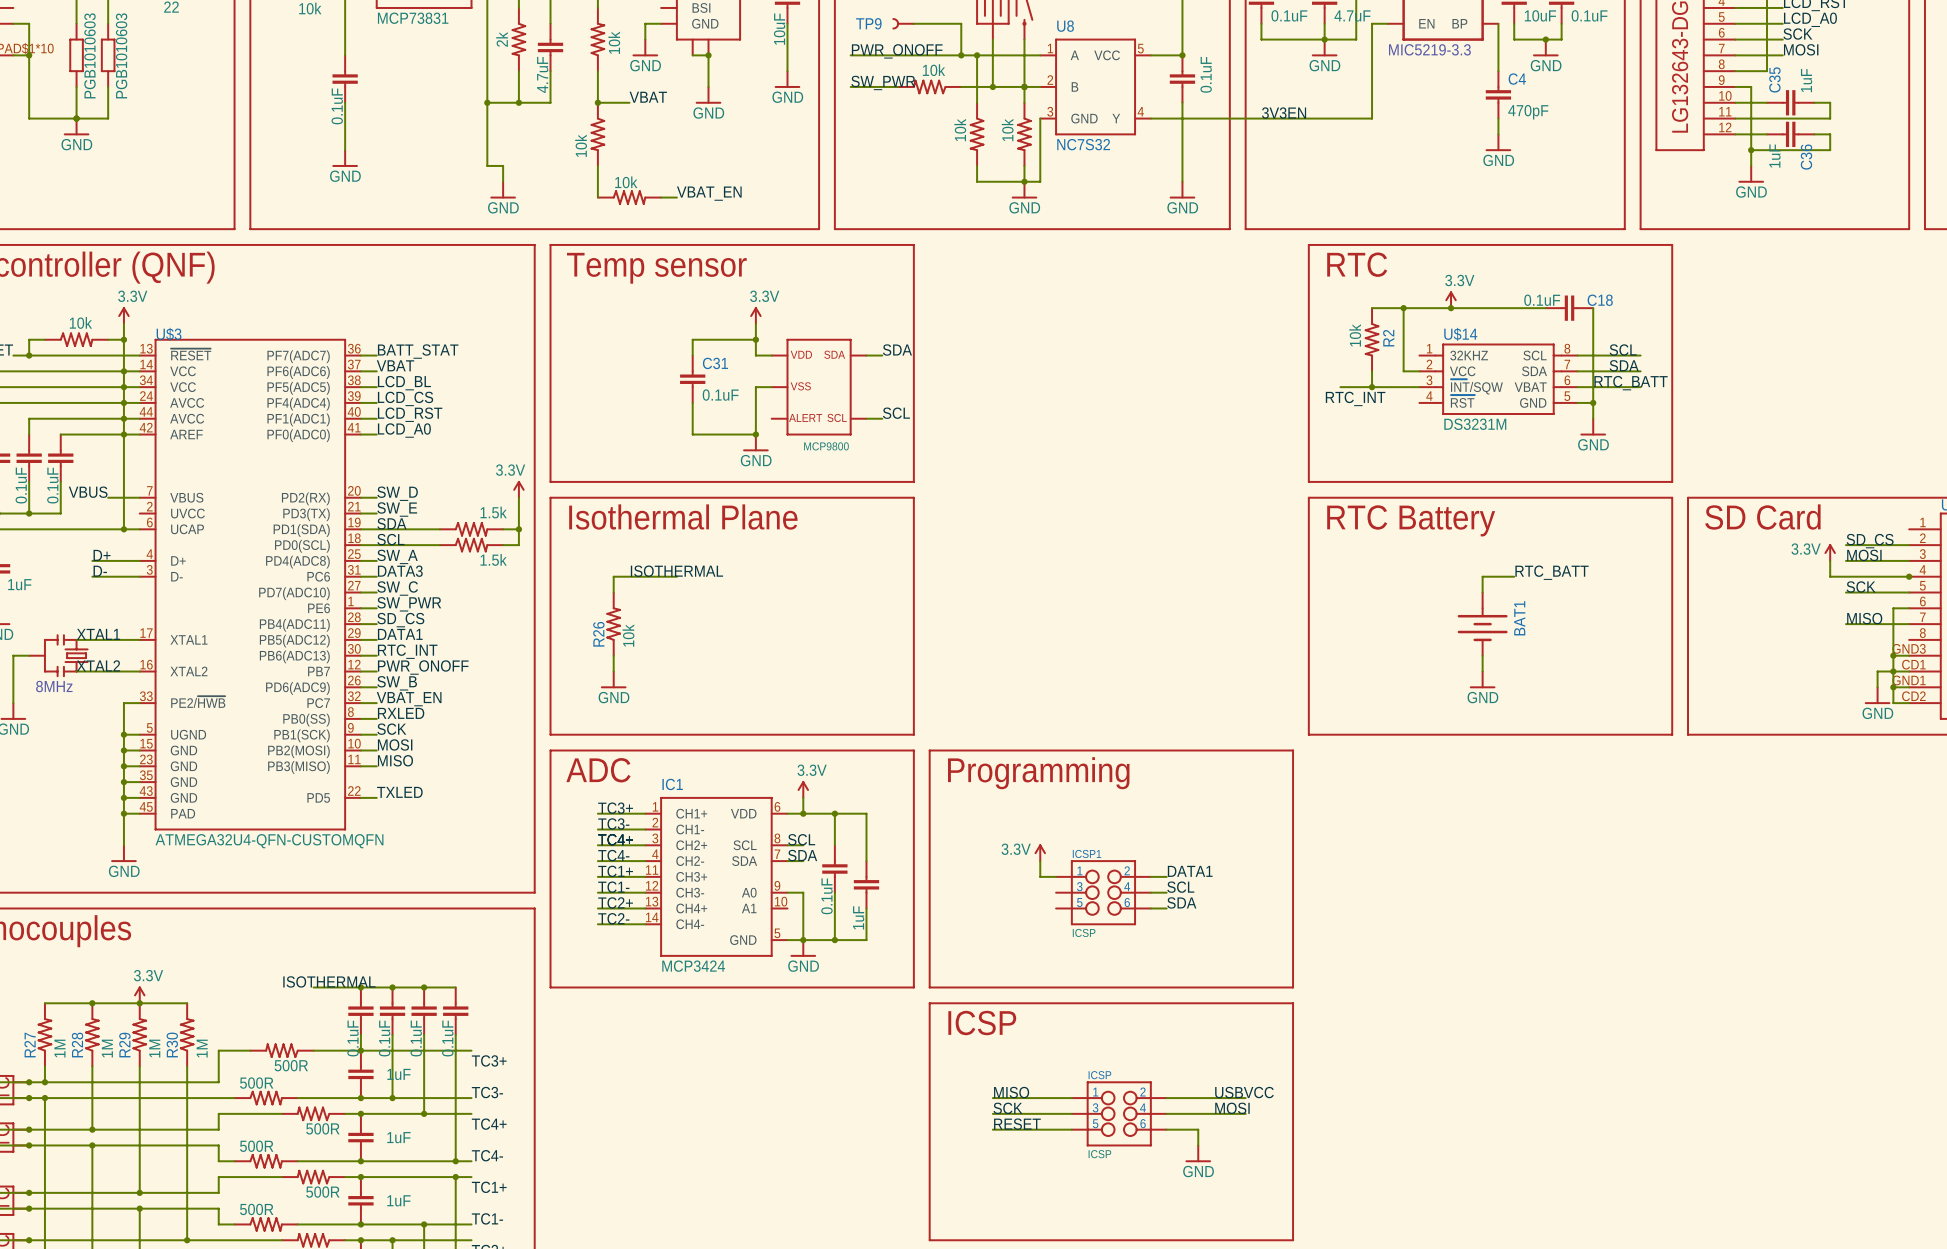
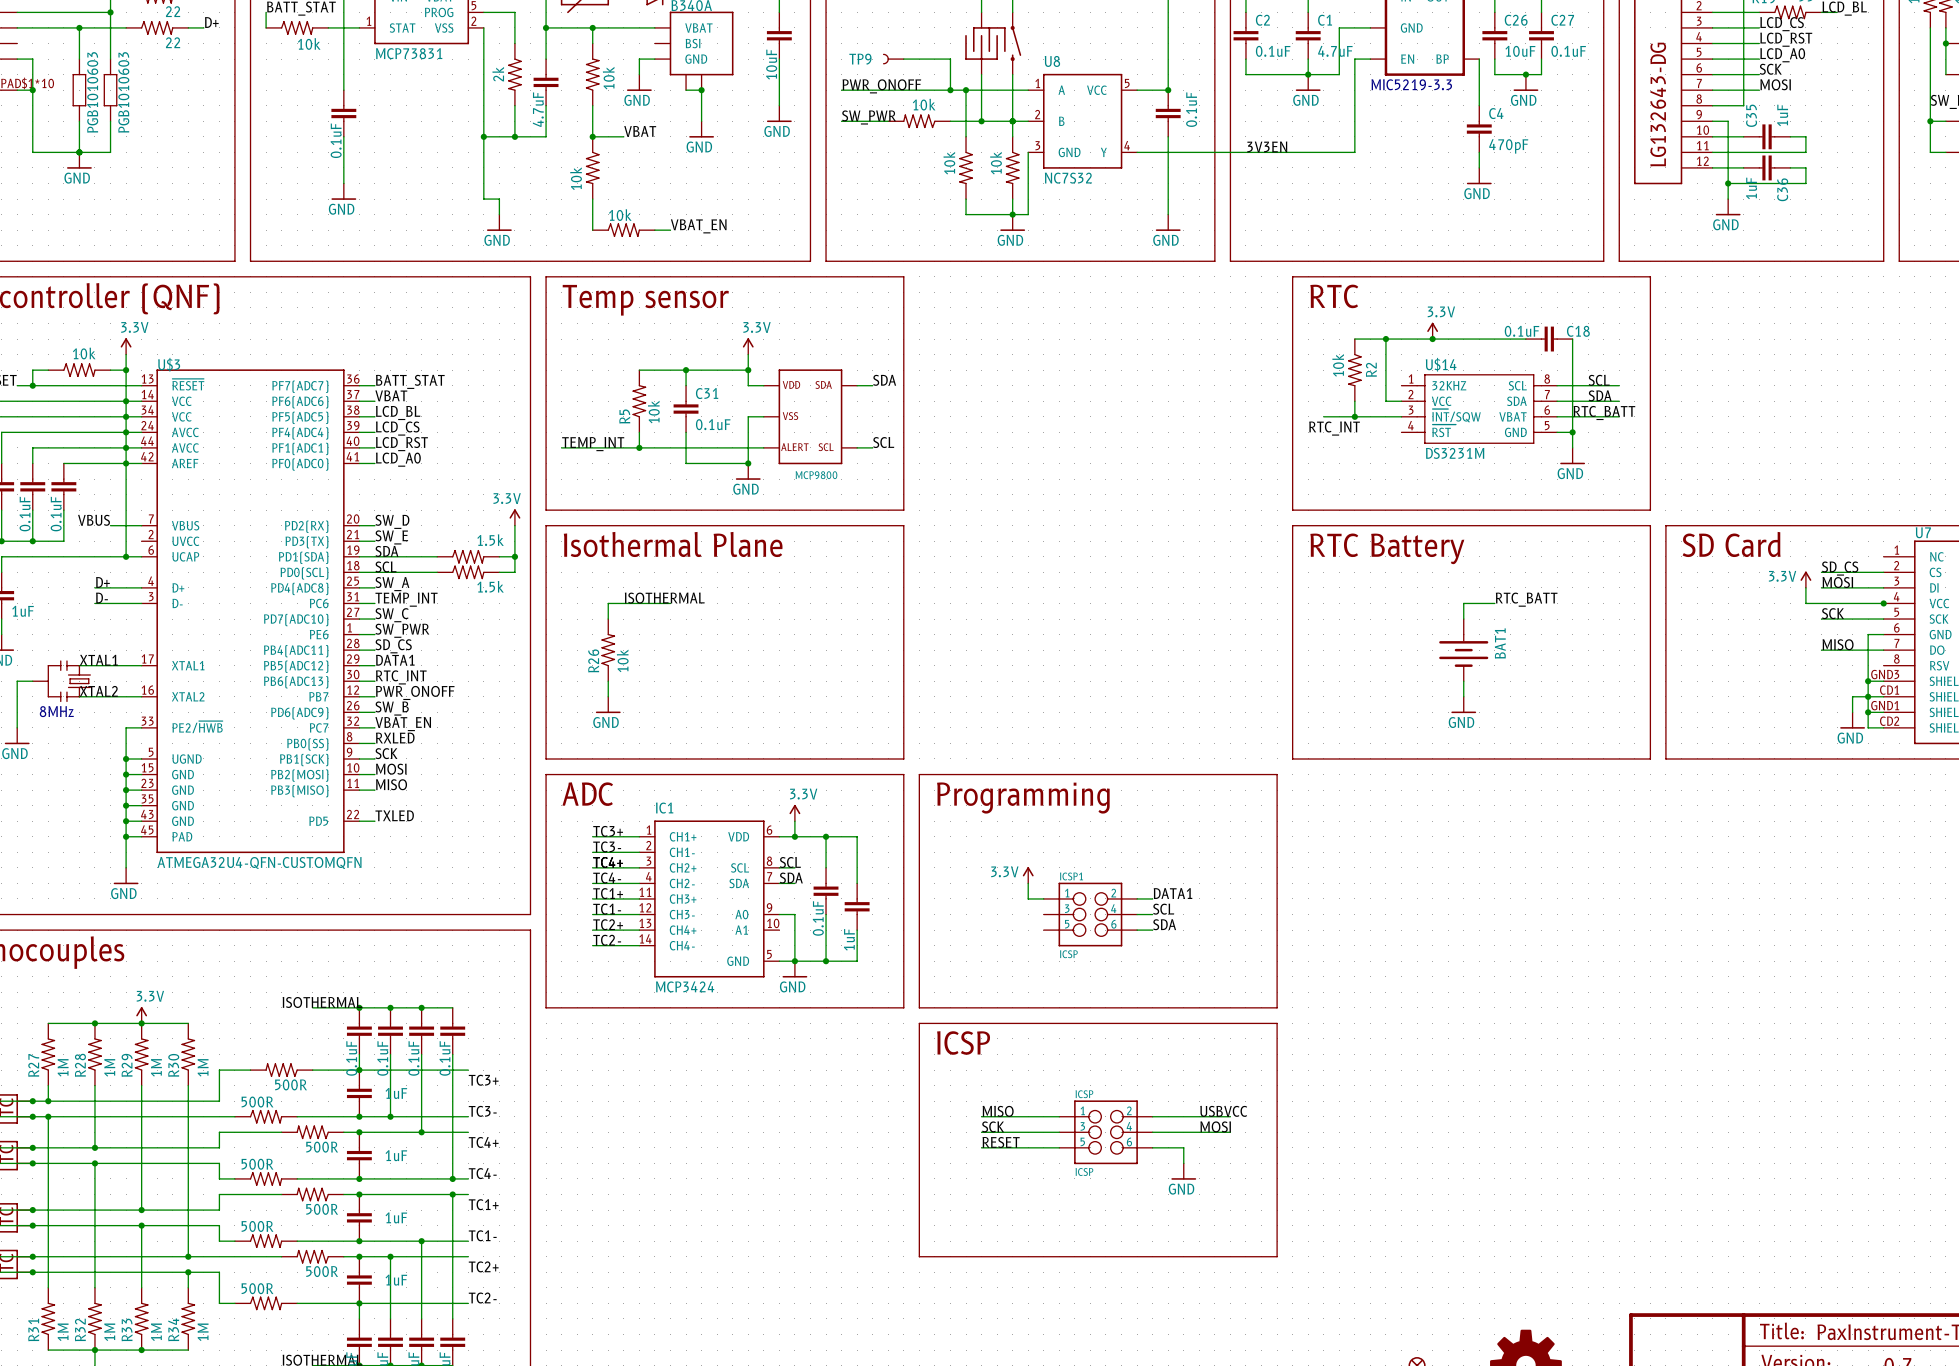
wire: none -> (639, 370) (686, 370)
junction: none -> (686, 370)
R5: none -> 10k (639, 401)
wire: none -> (639, 432) (639, 447)
label: none -> TEMP_INT (593, 444)
wire: none -> (561, 447) (763, 447)
junction: none -> (639, 447)
label: DATA3 (400, 571) -> TEMP_INT (406, 599)

